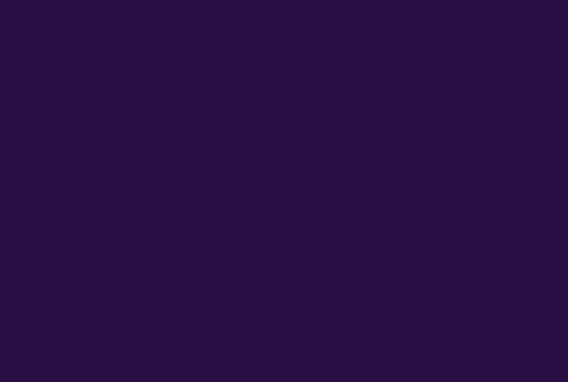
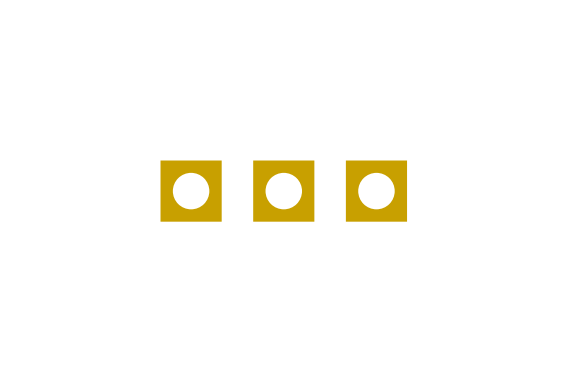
part: none -> (283, 191)

